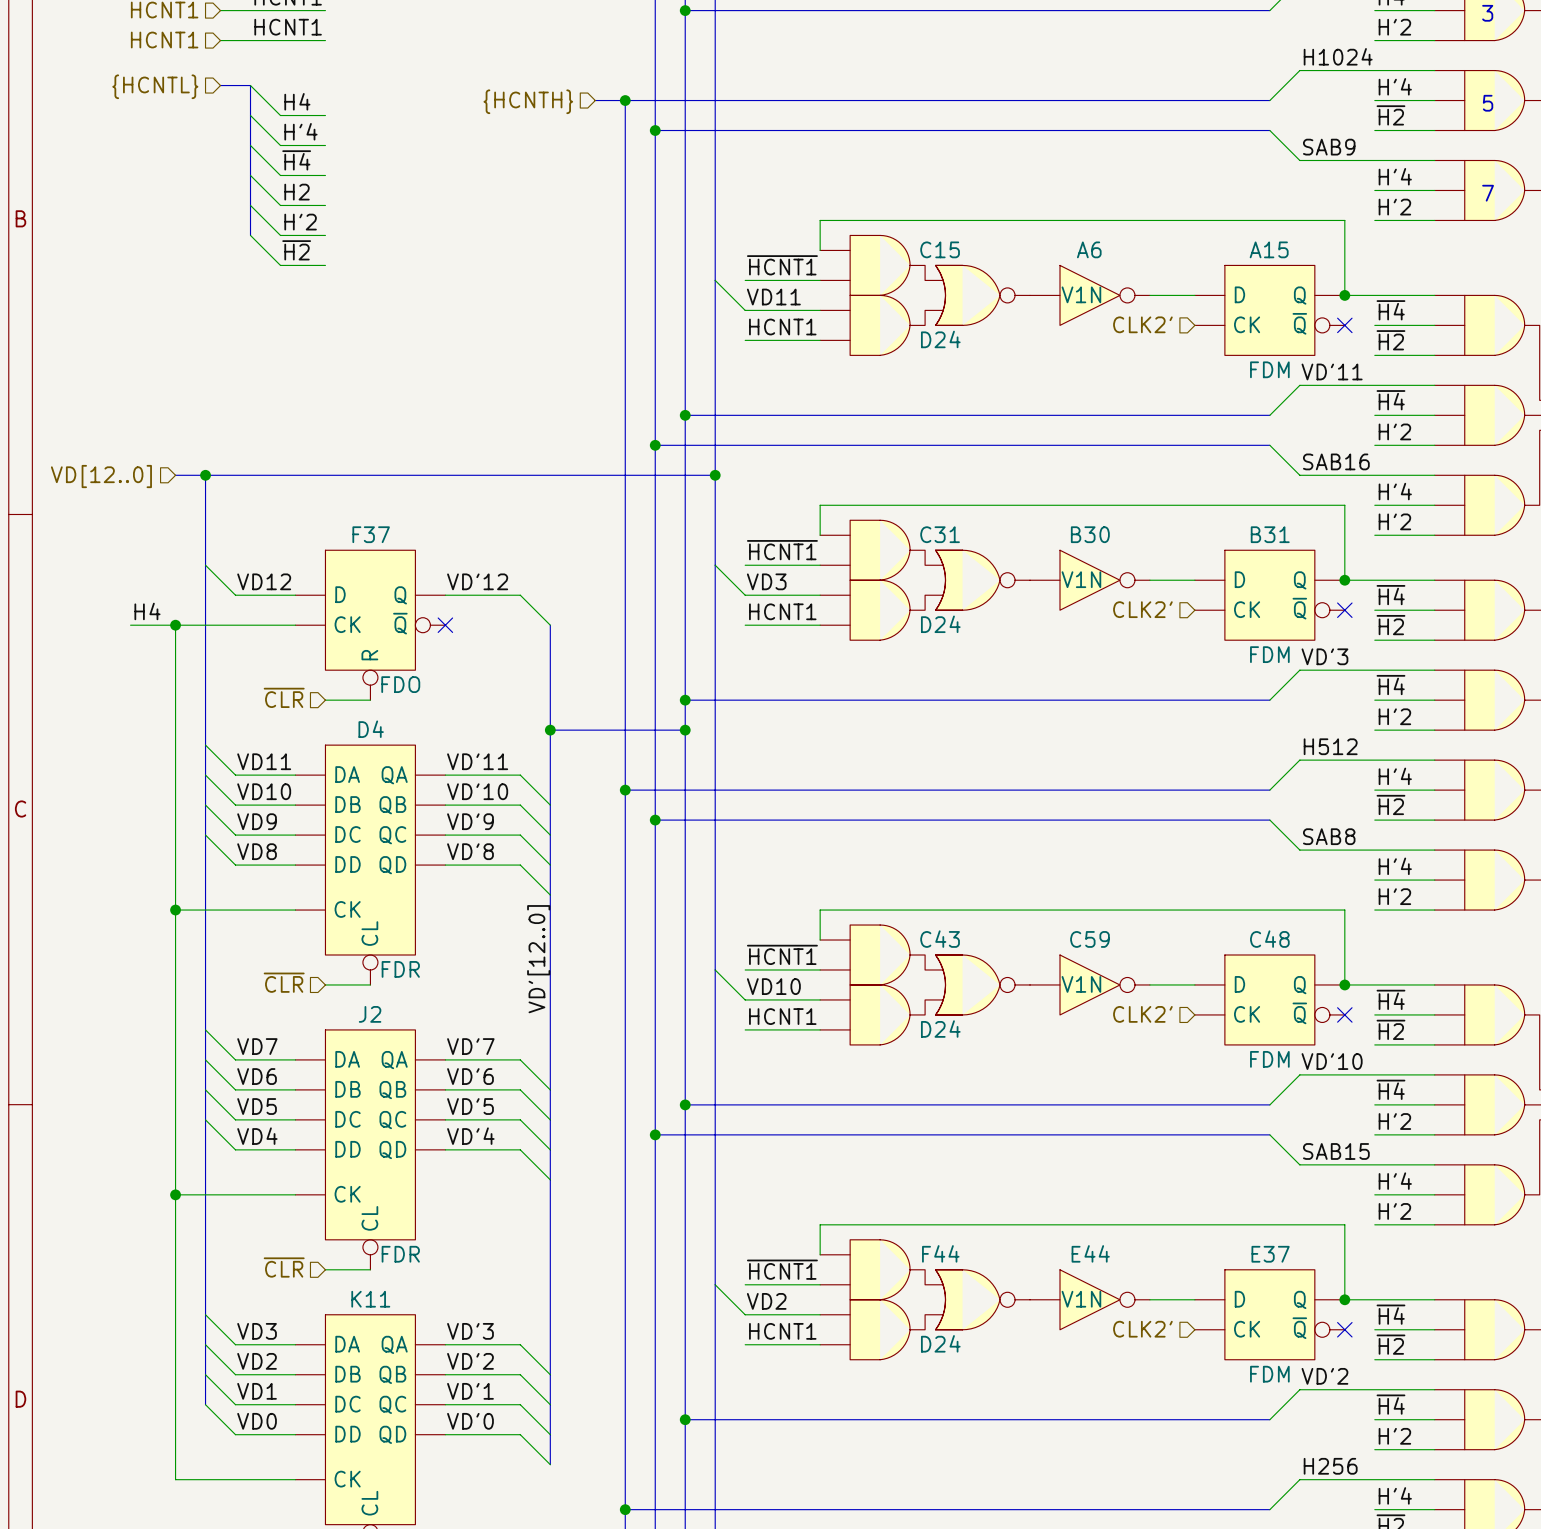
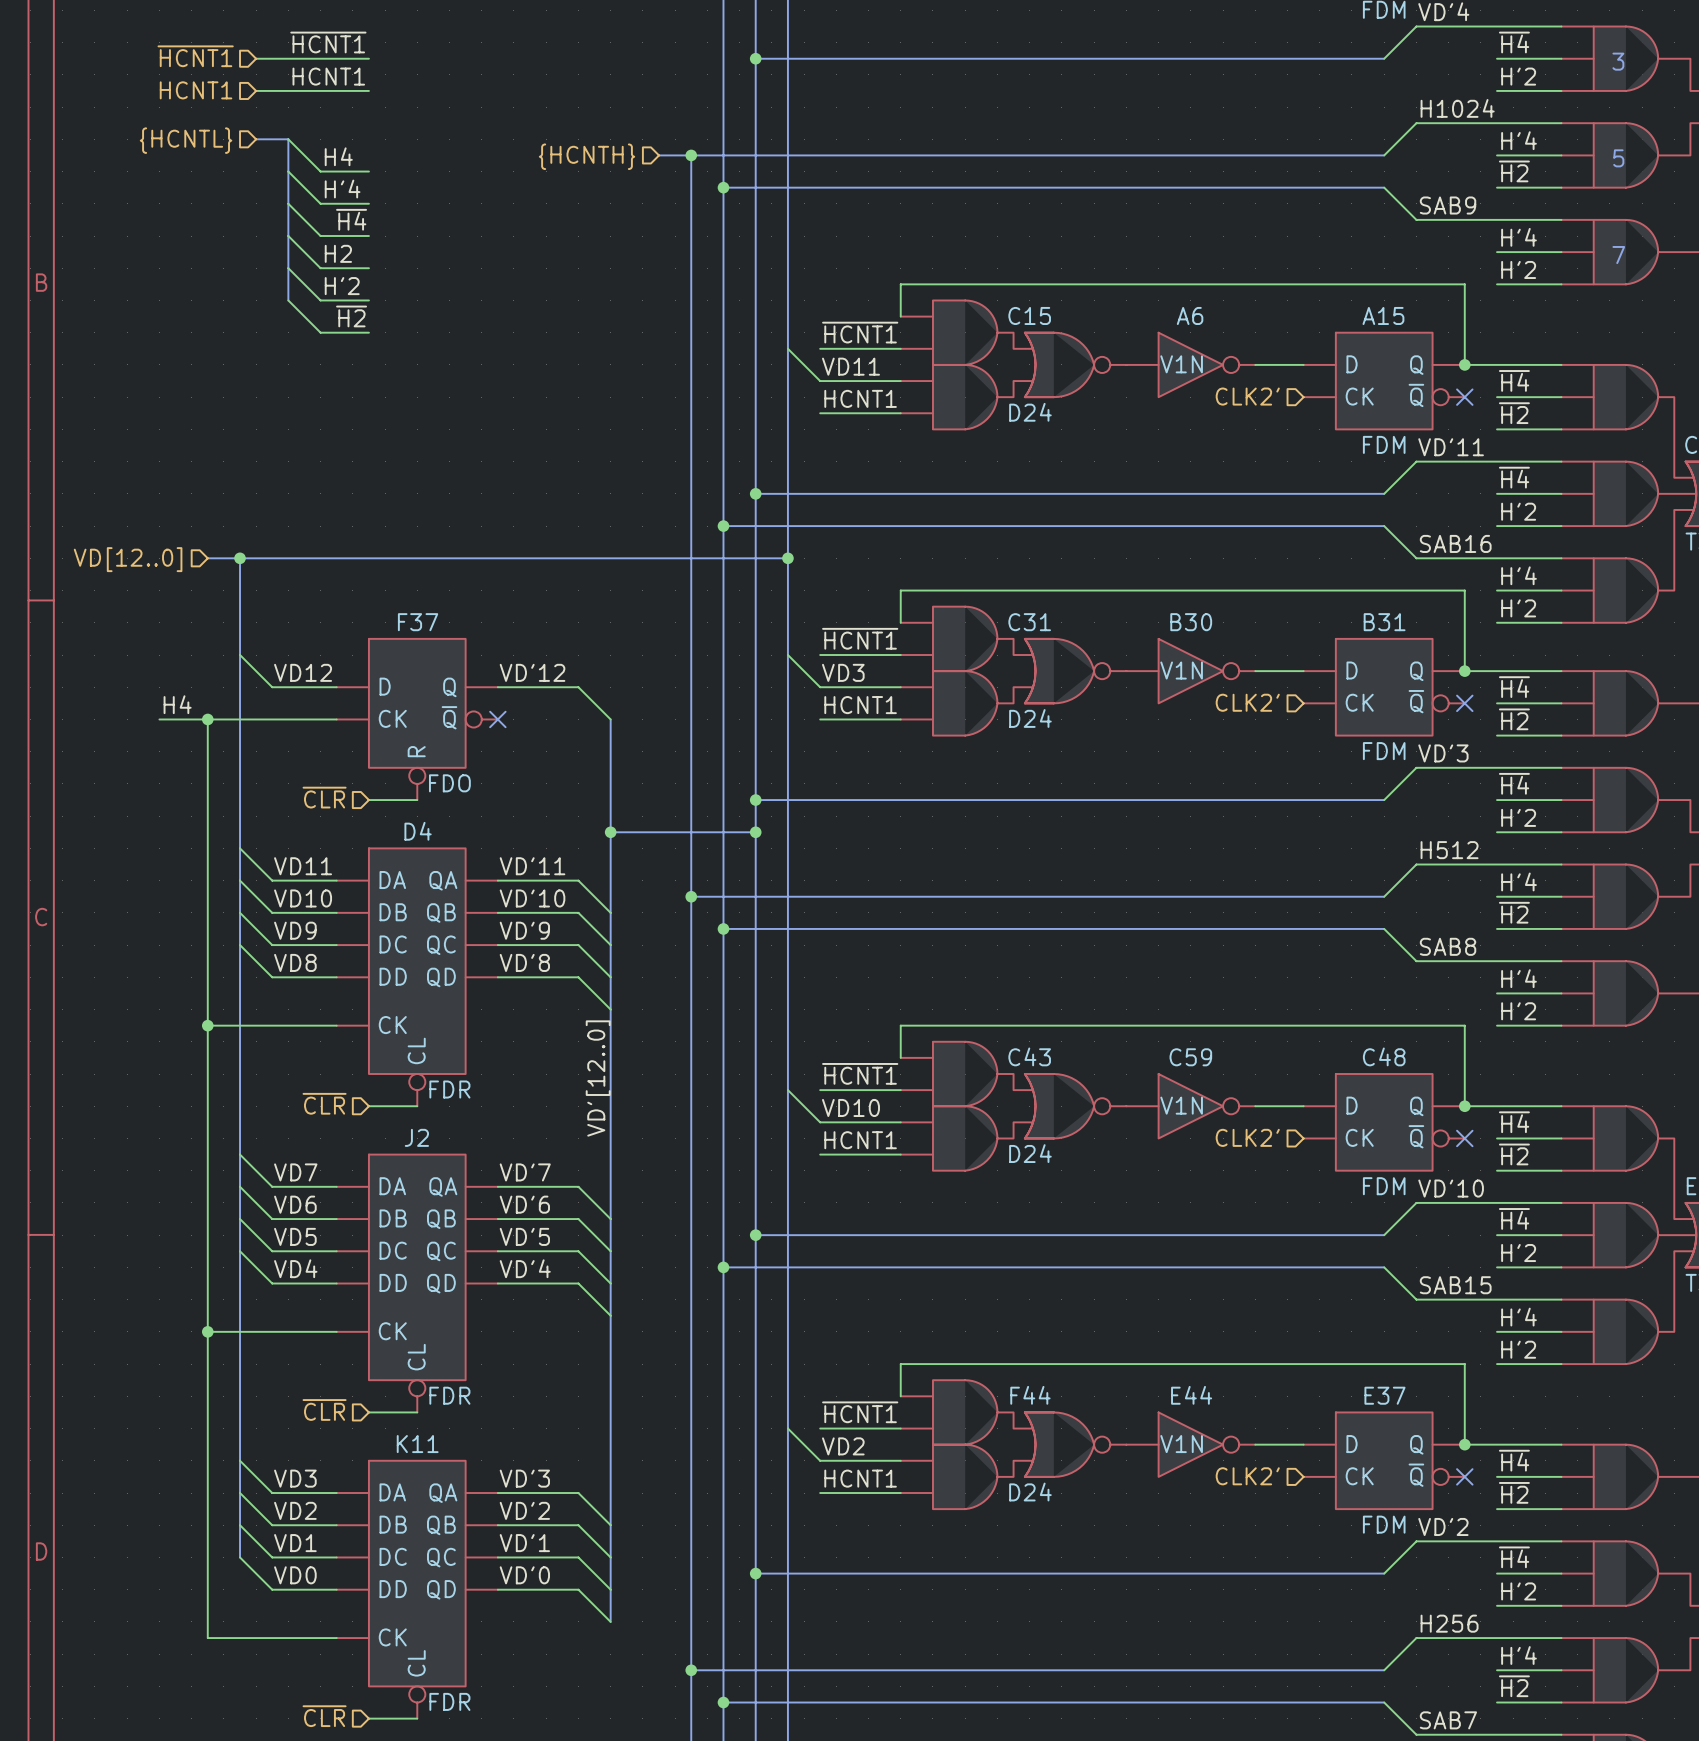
label position: ~{H4} (296, 160) -> ~{H4} (351, 219)
label position: ~{H2} (296, 250) -> ~{H2} (351, 316)

